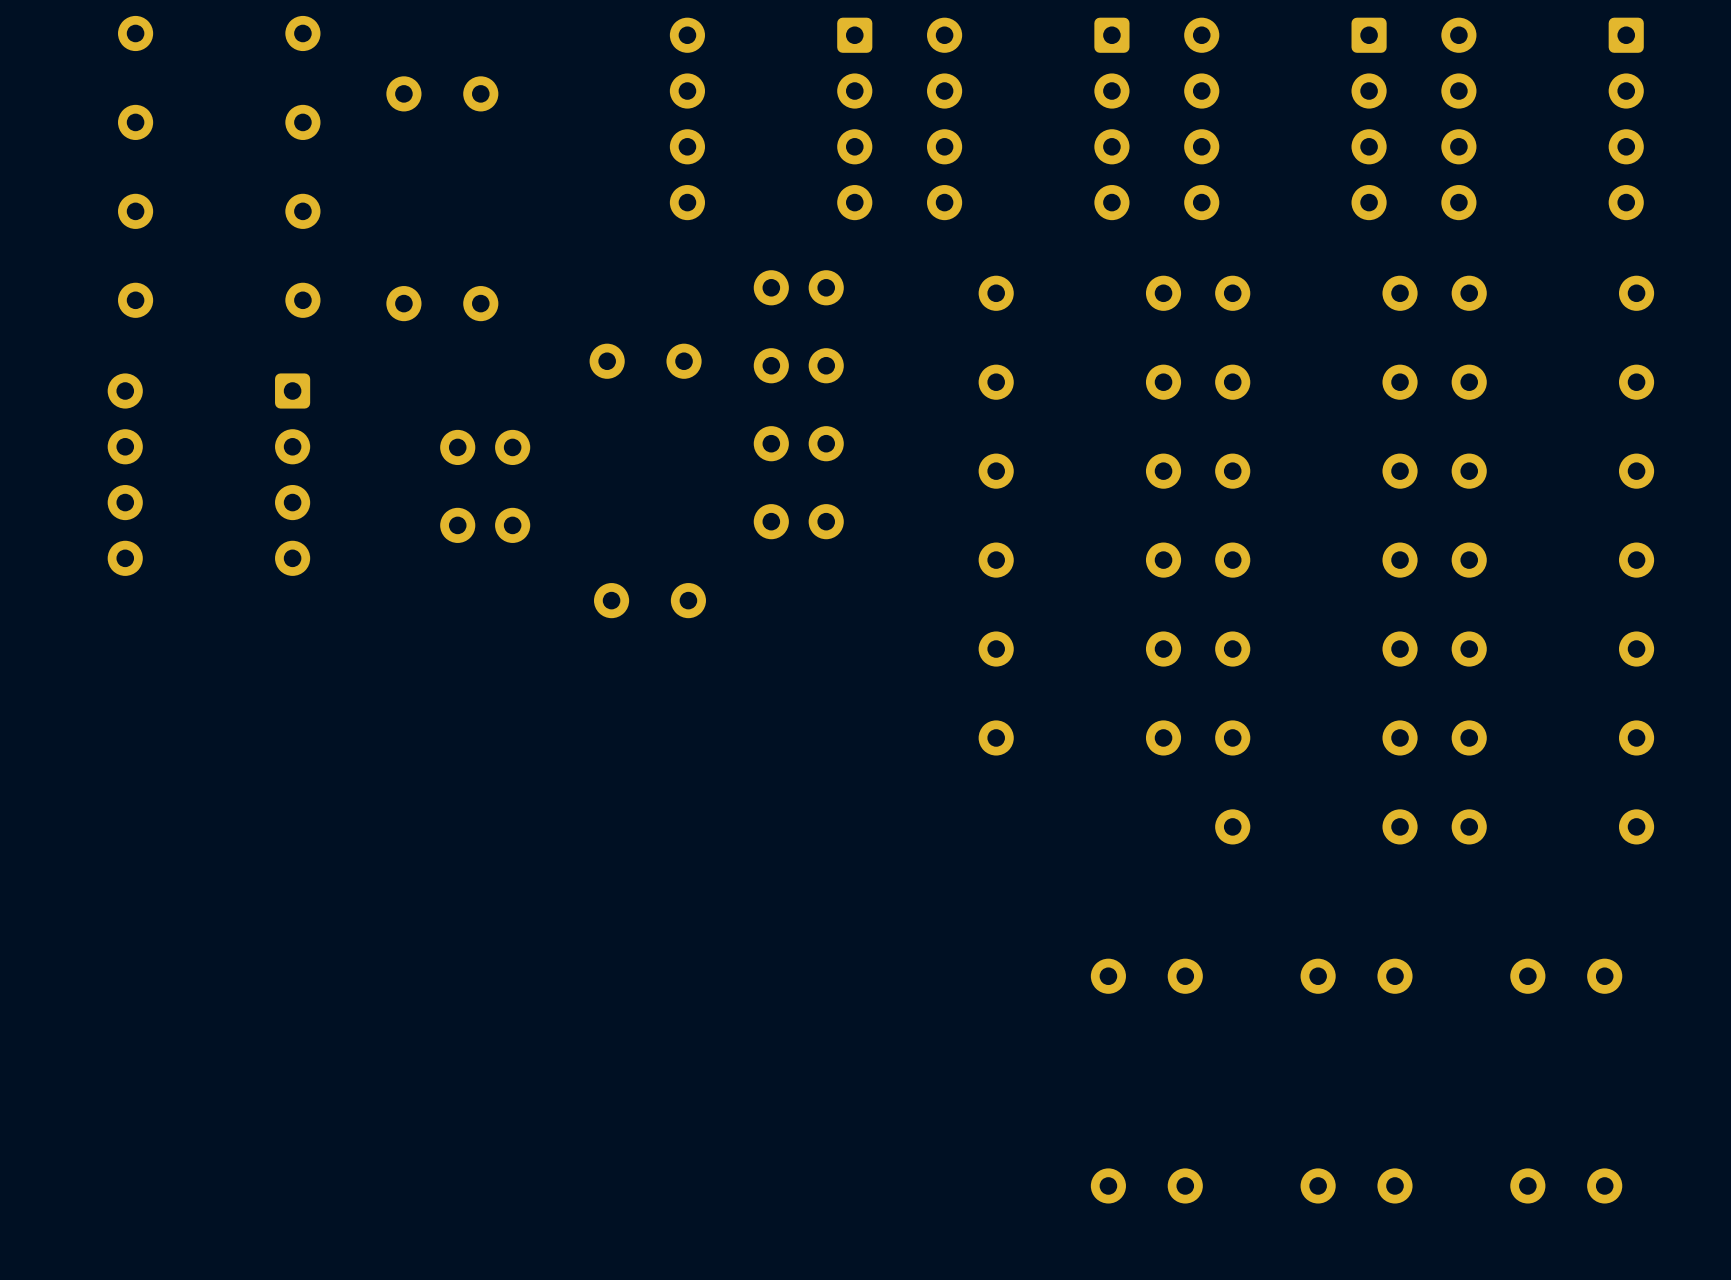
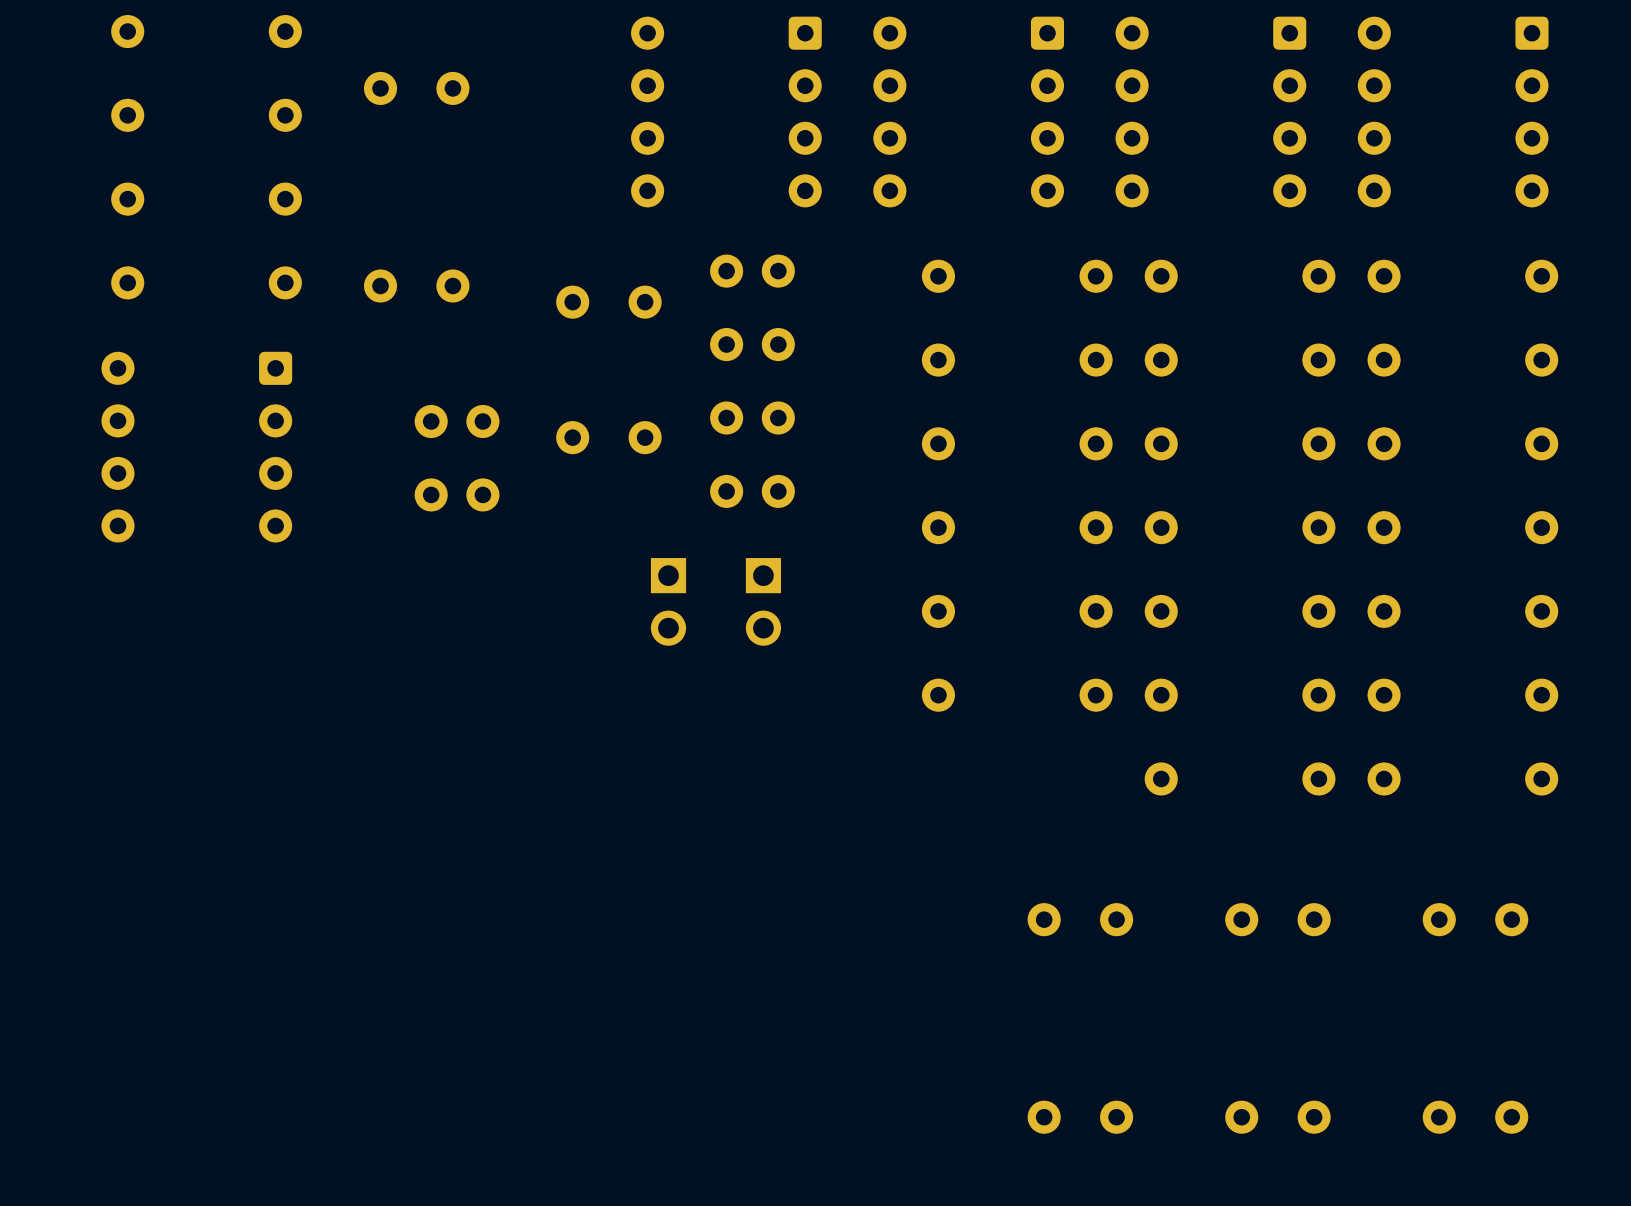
part position: (645, 361) -> (608, 302)
part: none -> (608, 437)
part: (649, 600) -> none
part: none -> (668, 601)
part: none -> (763, 601)

